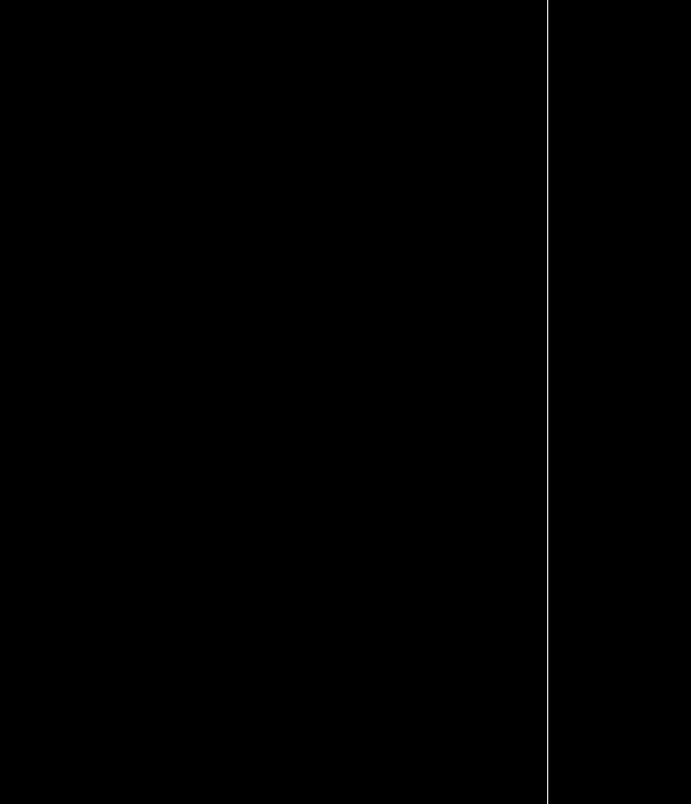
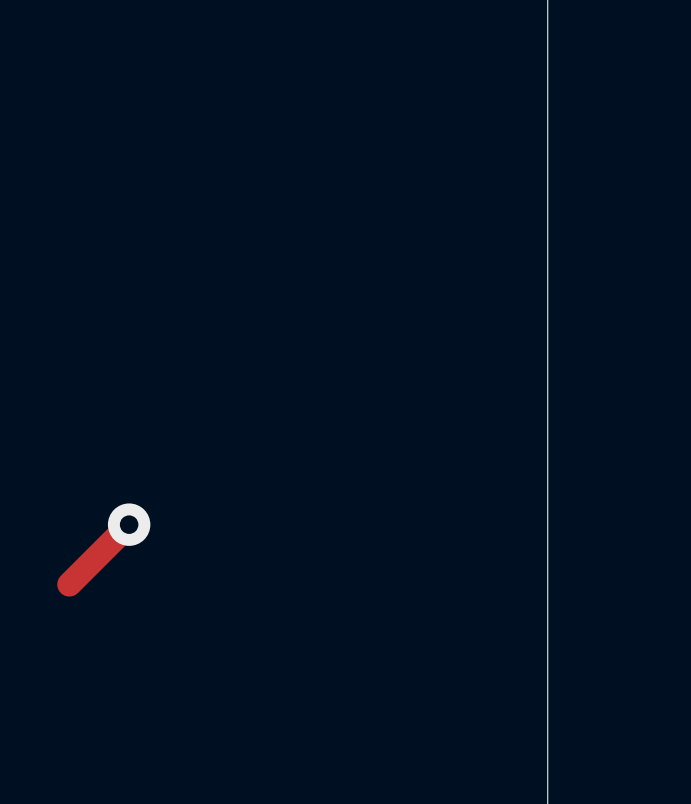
track: none -> (129, 524) (69, 584)
via: none -> (129, 524)

